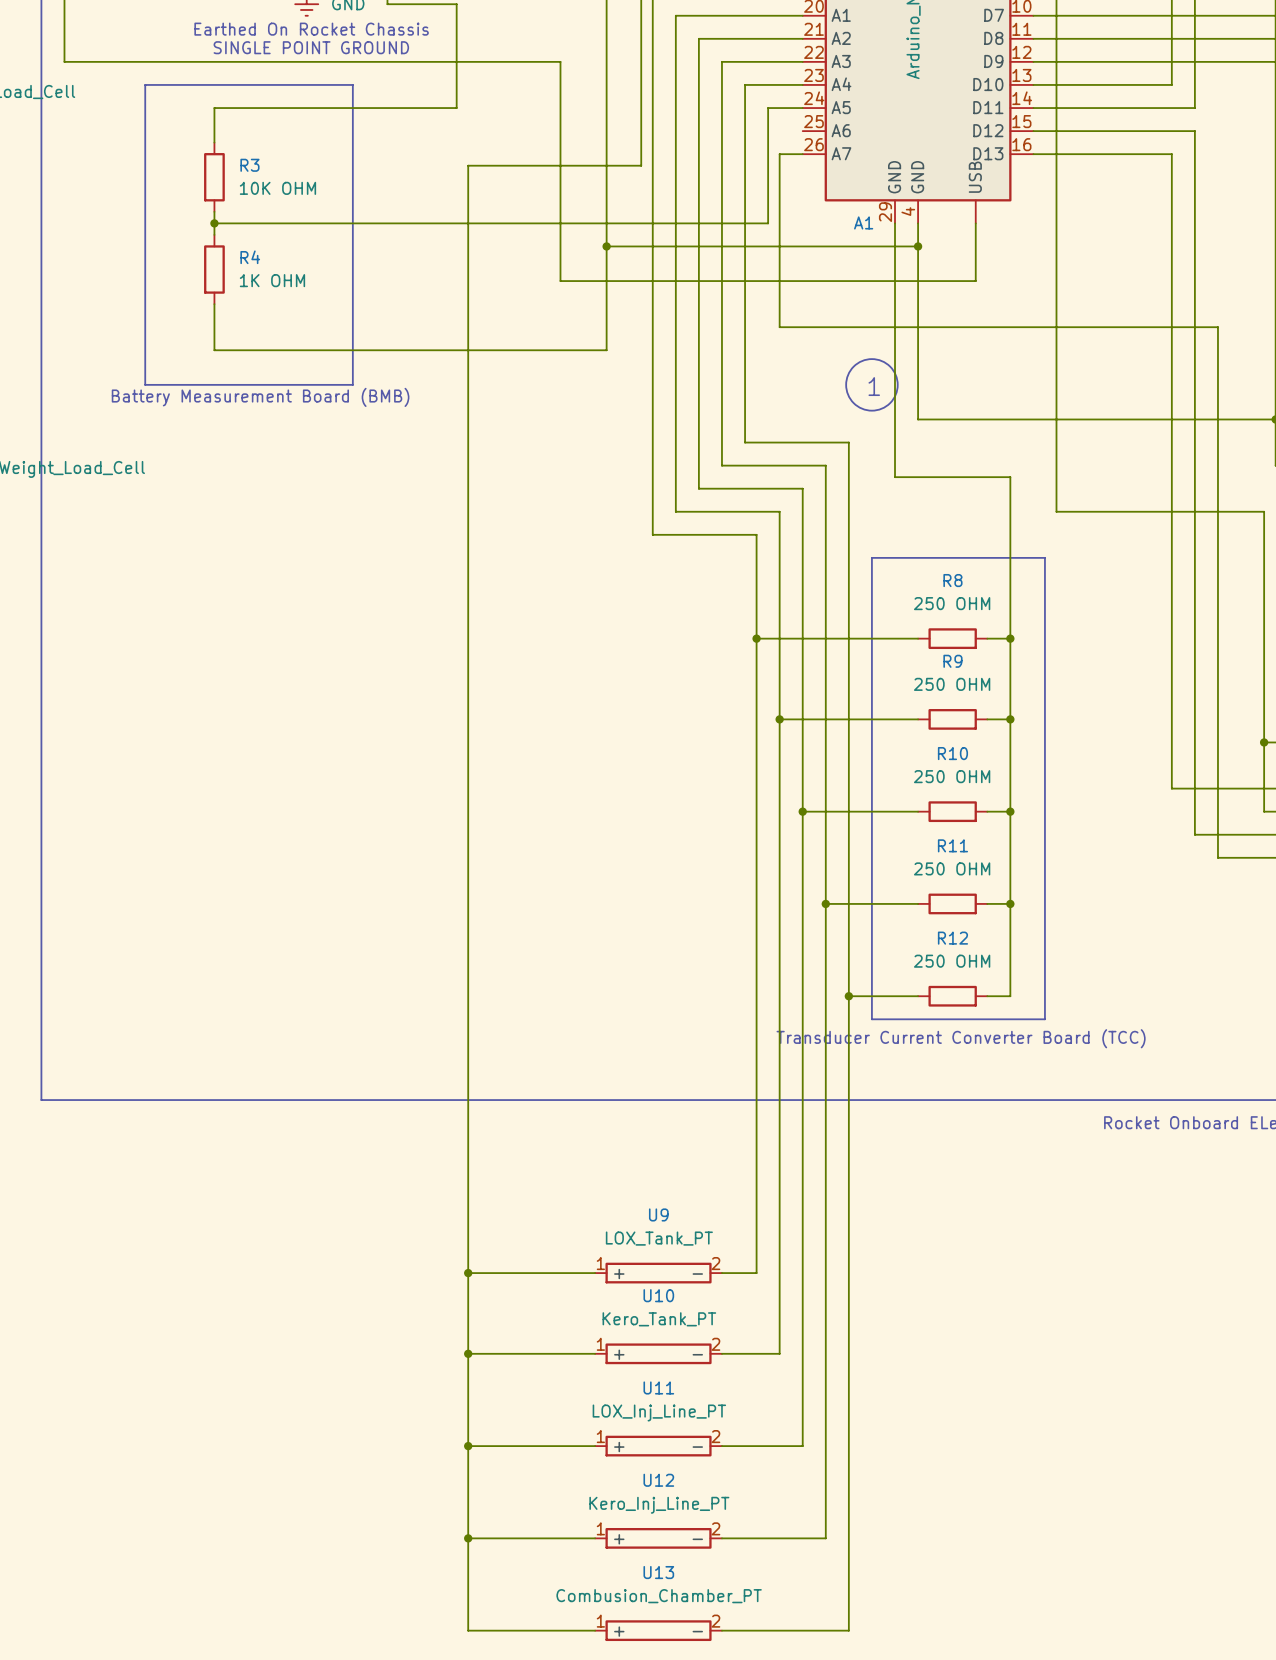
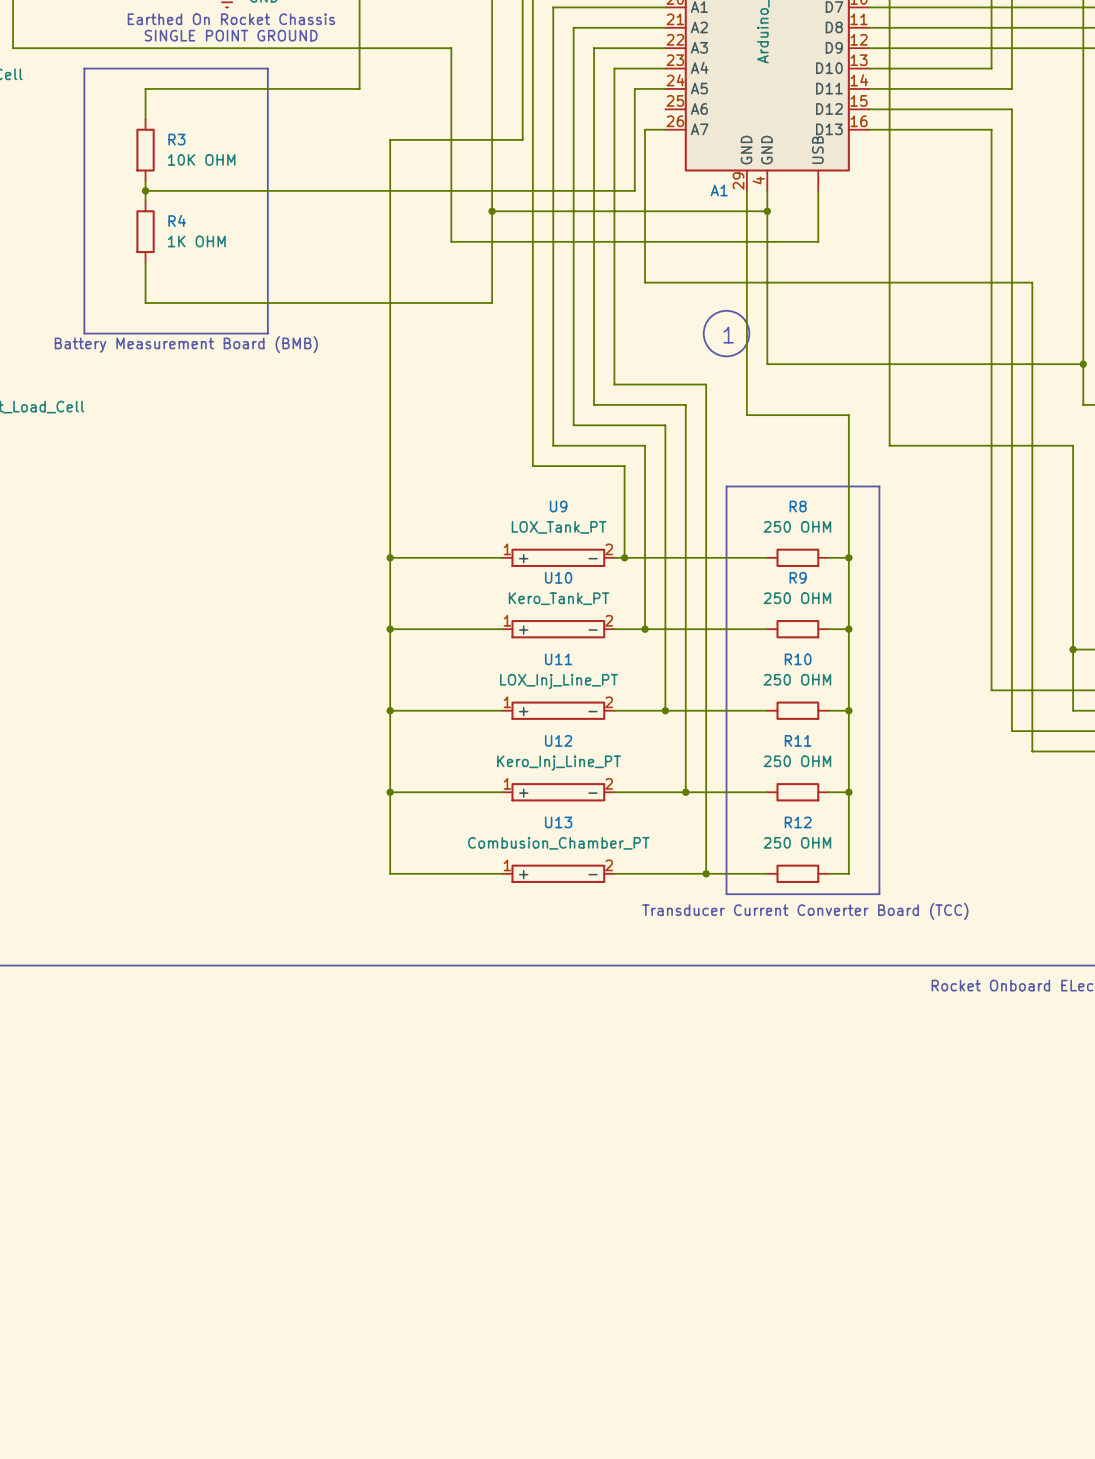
wire: (491, 165) (468, 165) (468, 1630) (595, 1630) -> (390, 139) (390, 873) (502, 873)
wire: none -> (390, 557) (502, 557)
junction: none -> (390, 557)
wire: (756, 638) (756, 1273) (721, 1273) -> (624, 557) (614, 557)
wire: none -> (390, 629) (502, 629)
junction: none -> (390, 629)
wire: (779, 719) (779, 1353) (721, 1353) -> (645, 629) (614, 629)
wire: none -> (390, 710) (502, 710)
junction: none -> (390, 710)
wire: (802, 811) (802, 1446) (721, 1446) -> (665, 710) (614, 710)
wire: none -> (390, 792) (502, 792)
junction: none -> (390, 792)
wire: (825, 903) (825, 1538) (721, 1538) -> (685, 792) (614, 792)
wire: (848, 996) (848, 1630) (721, 1630) -> (706, 873) (614, 873)
wire: (468, 1273) (595, 1273) -> none
junction: (468, 1273) -> none
U9 position: (658, 1273) -> (558, 557)
wire: (468, 1353) (595, 1353) -> none
junction: (468, 1353) -> none
U10 position: (658, 1353) -> (558, 629)
wire: (468, 1446) (595, 1446) -> none
junction: (468, 1446) -> none
U11 position: (658, 1446) -> (558, 710)
wire: (468, 1538) (595, 1538) -> none
junction: (468, 1538) -> none
U12 position: (658, 1538) -> (558, 792)
U13 position: (658, 1630) -> (558, 873)

